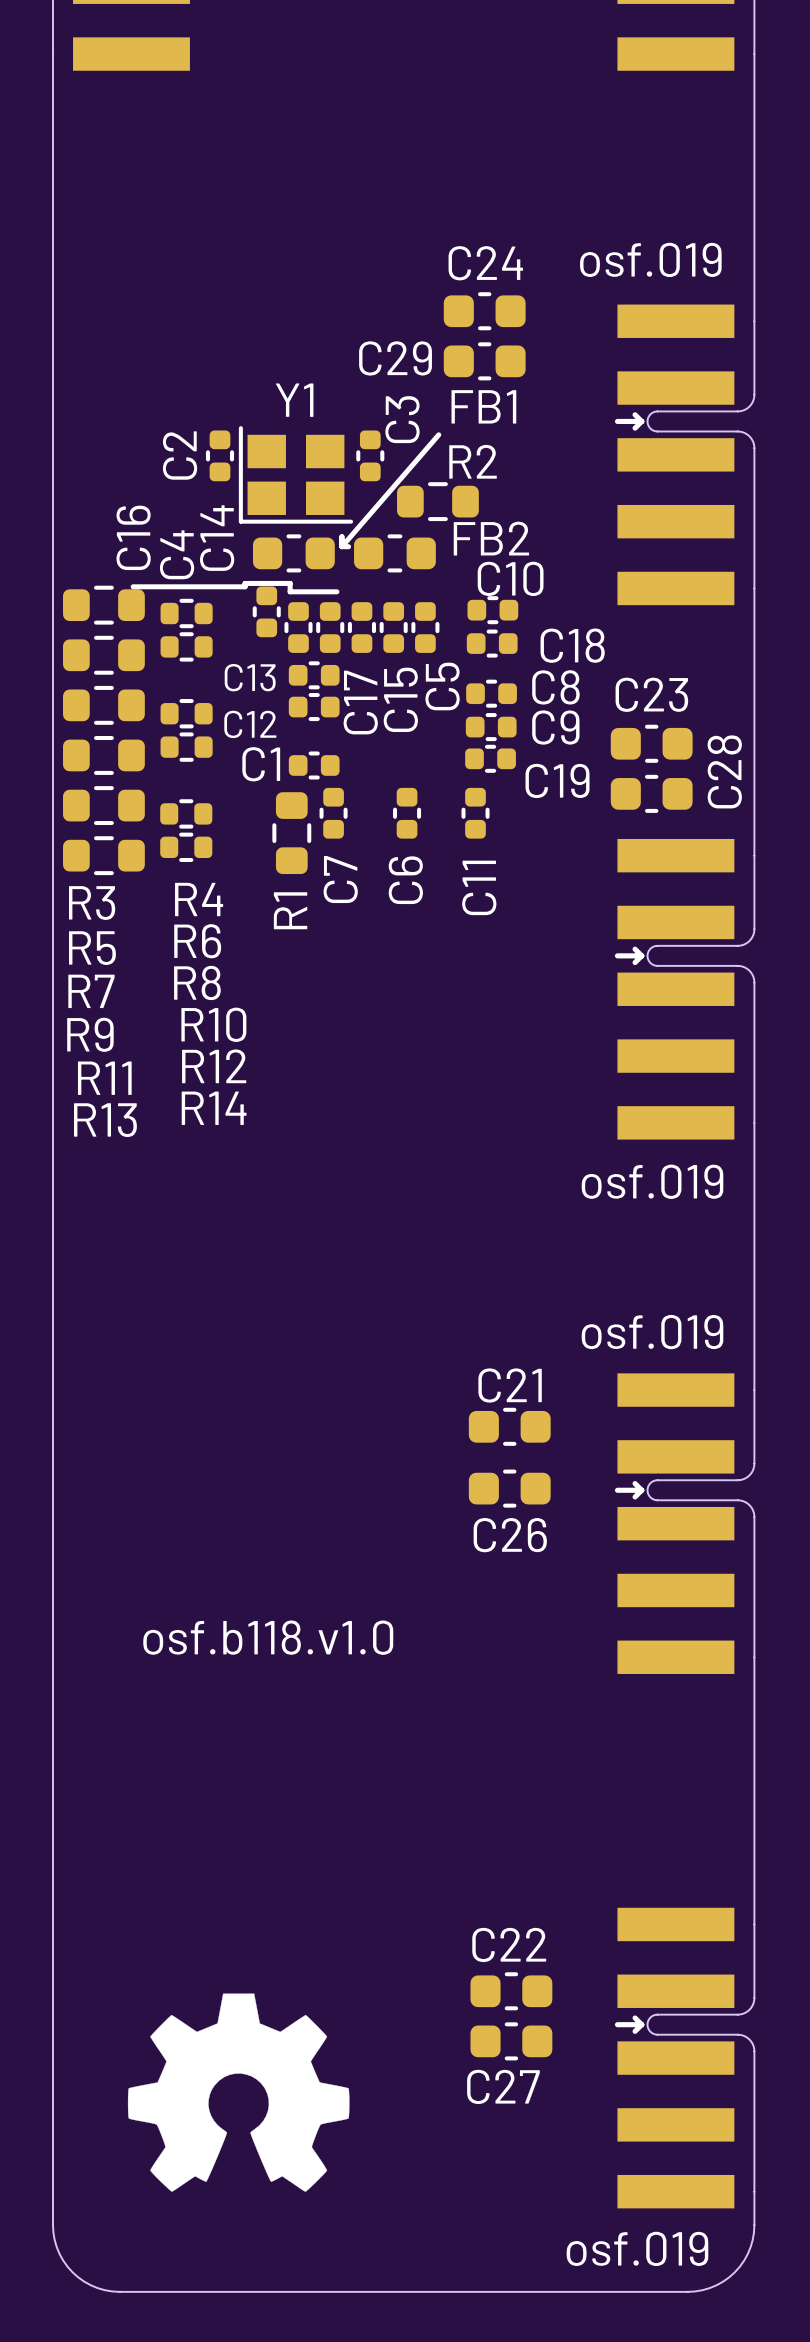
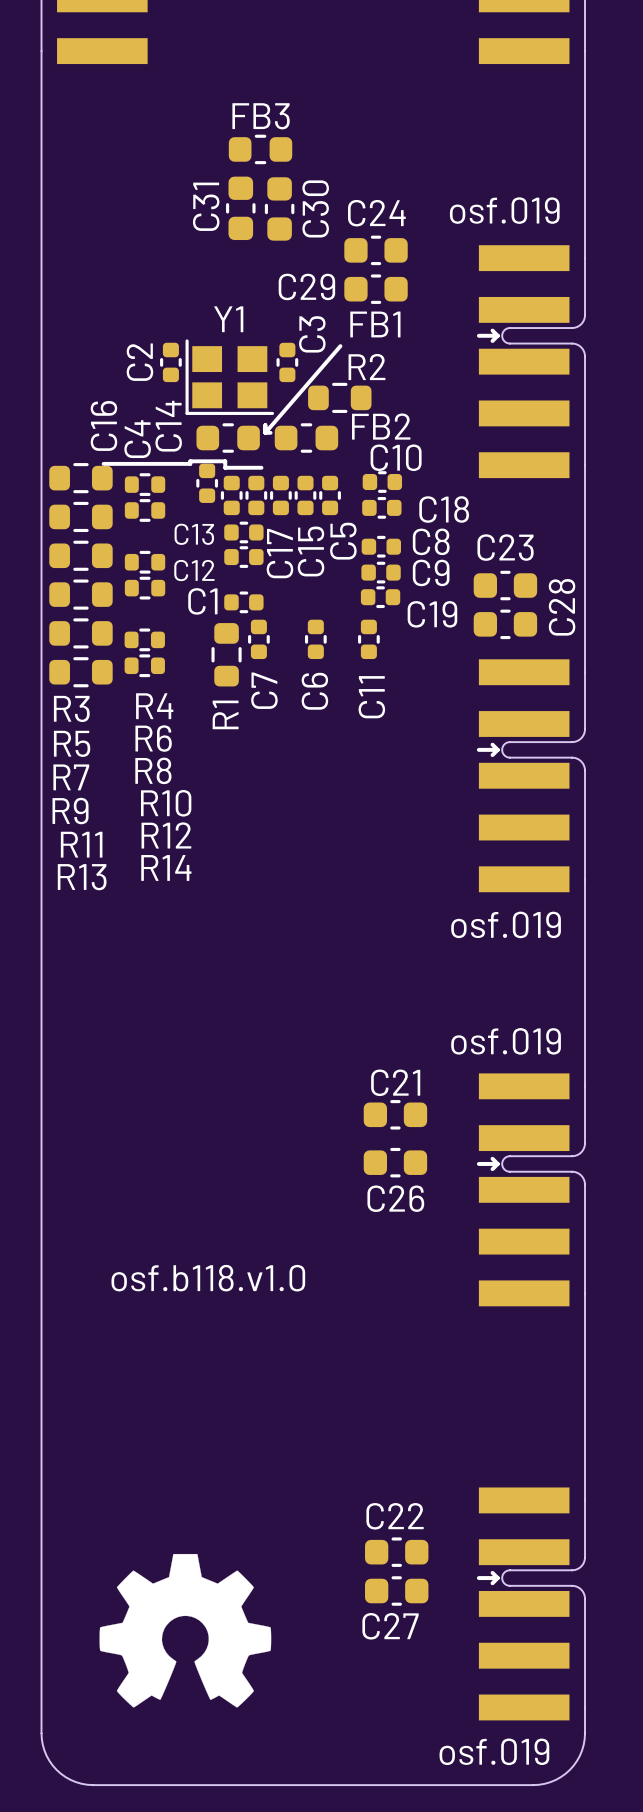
FB3: none -> (260, 149)
C31: none -> (240, 208)
C30: none -> (279, 208)

